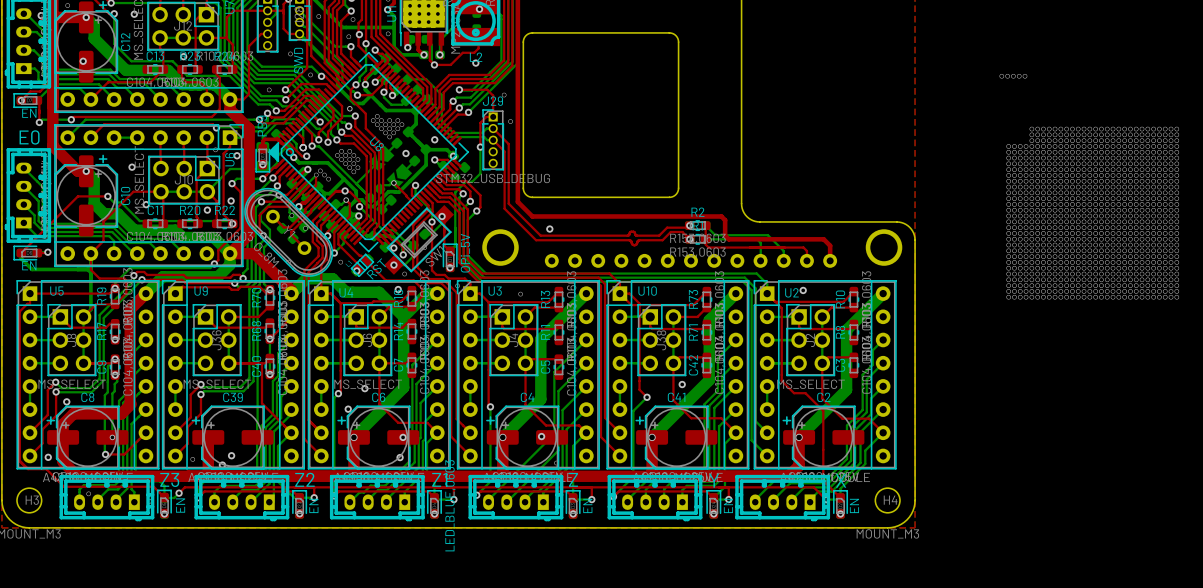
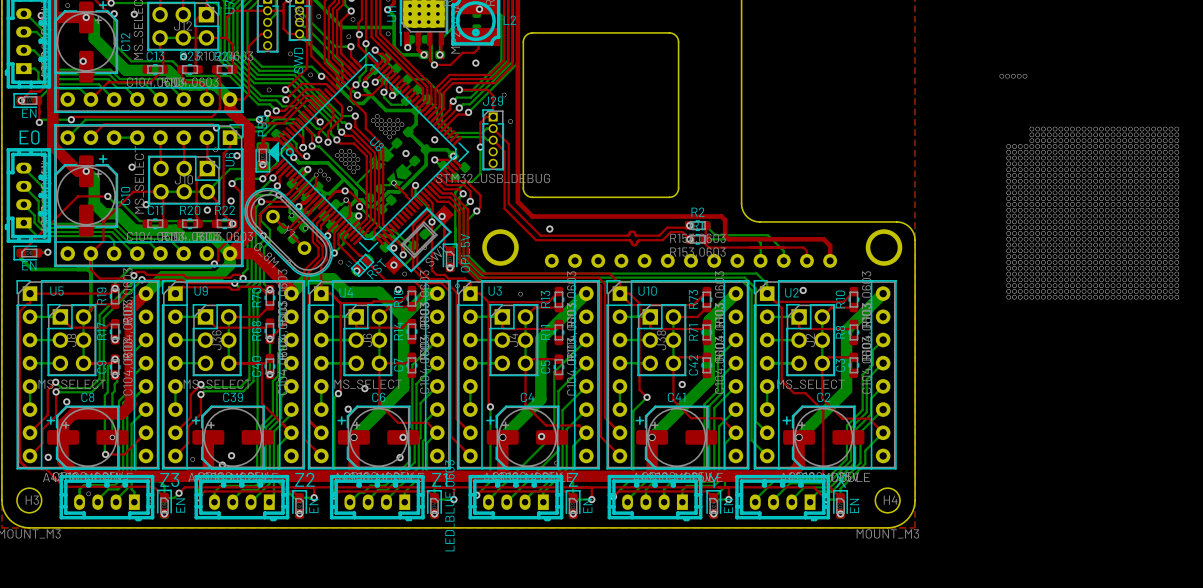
L2 name position: L2 (476, 57) -> L2 (509, 20)

